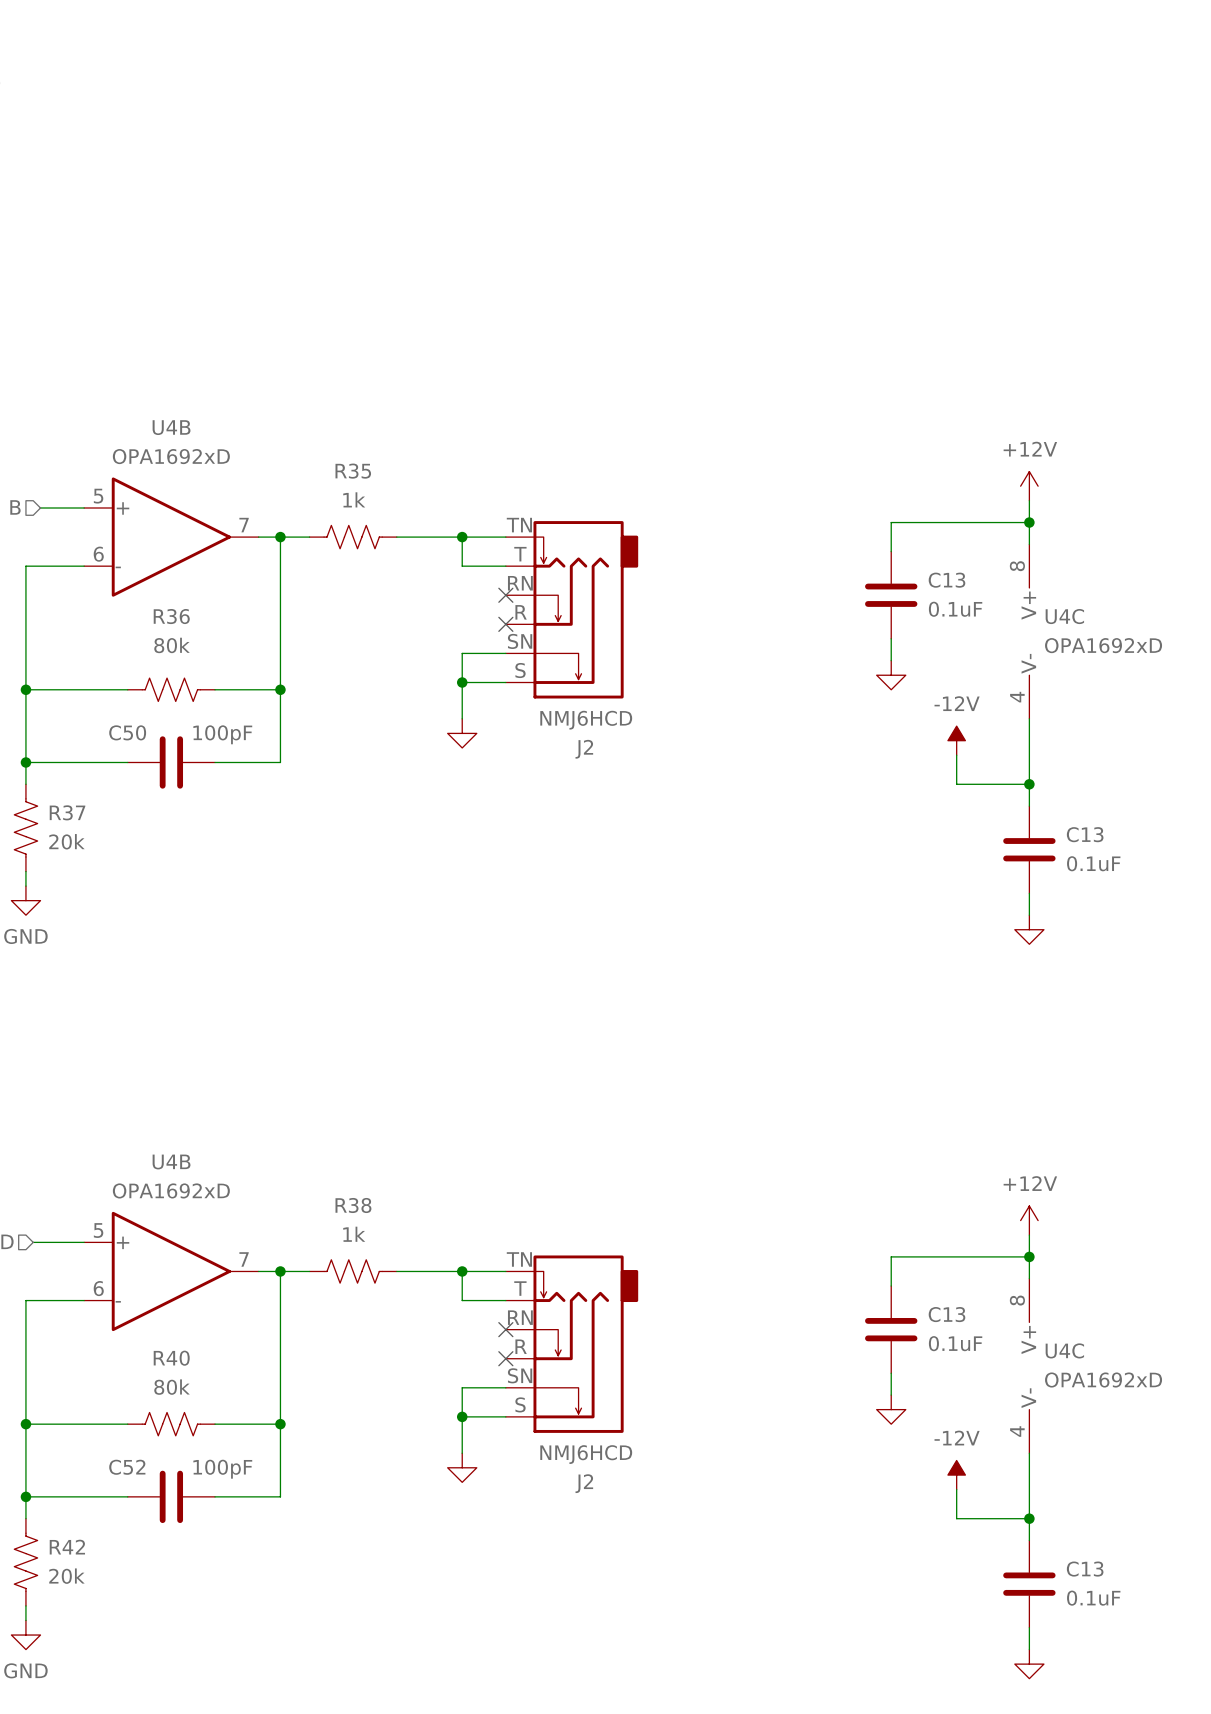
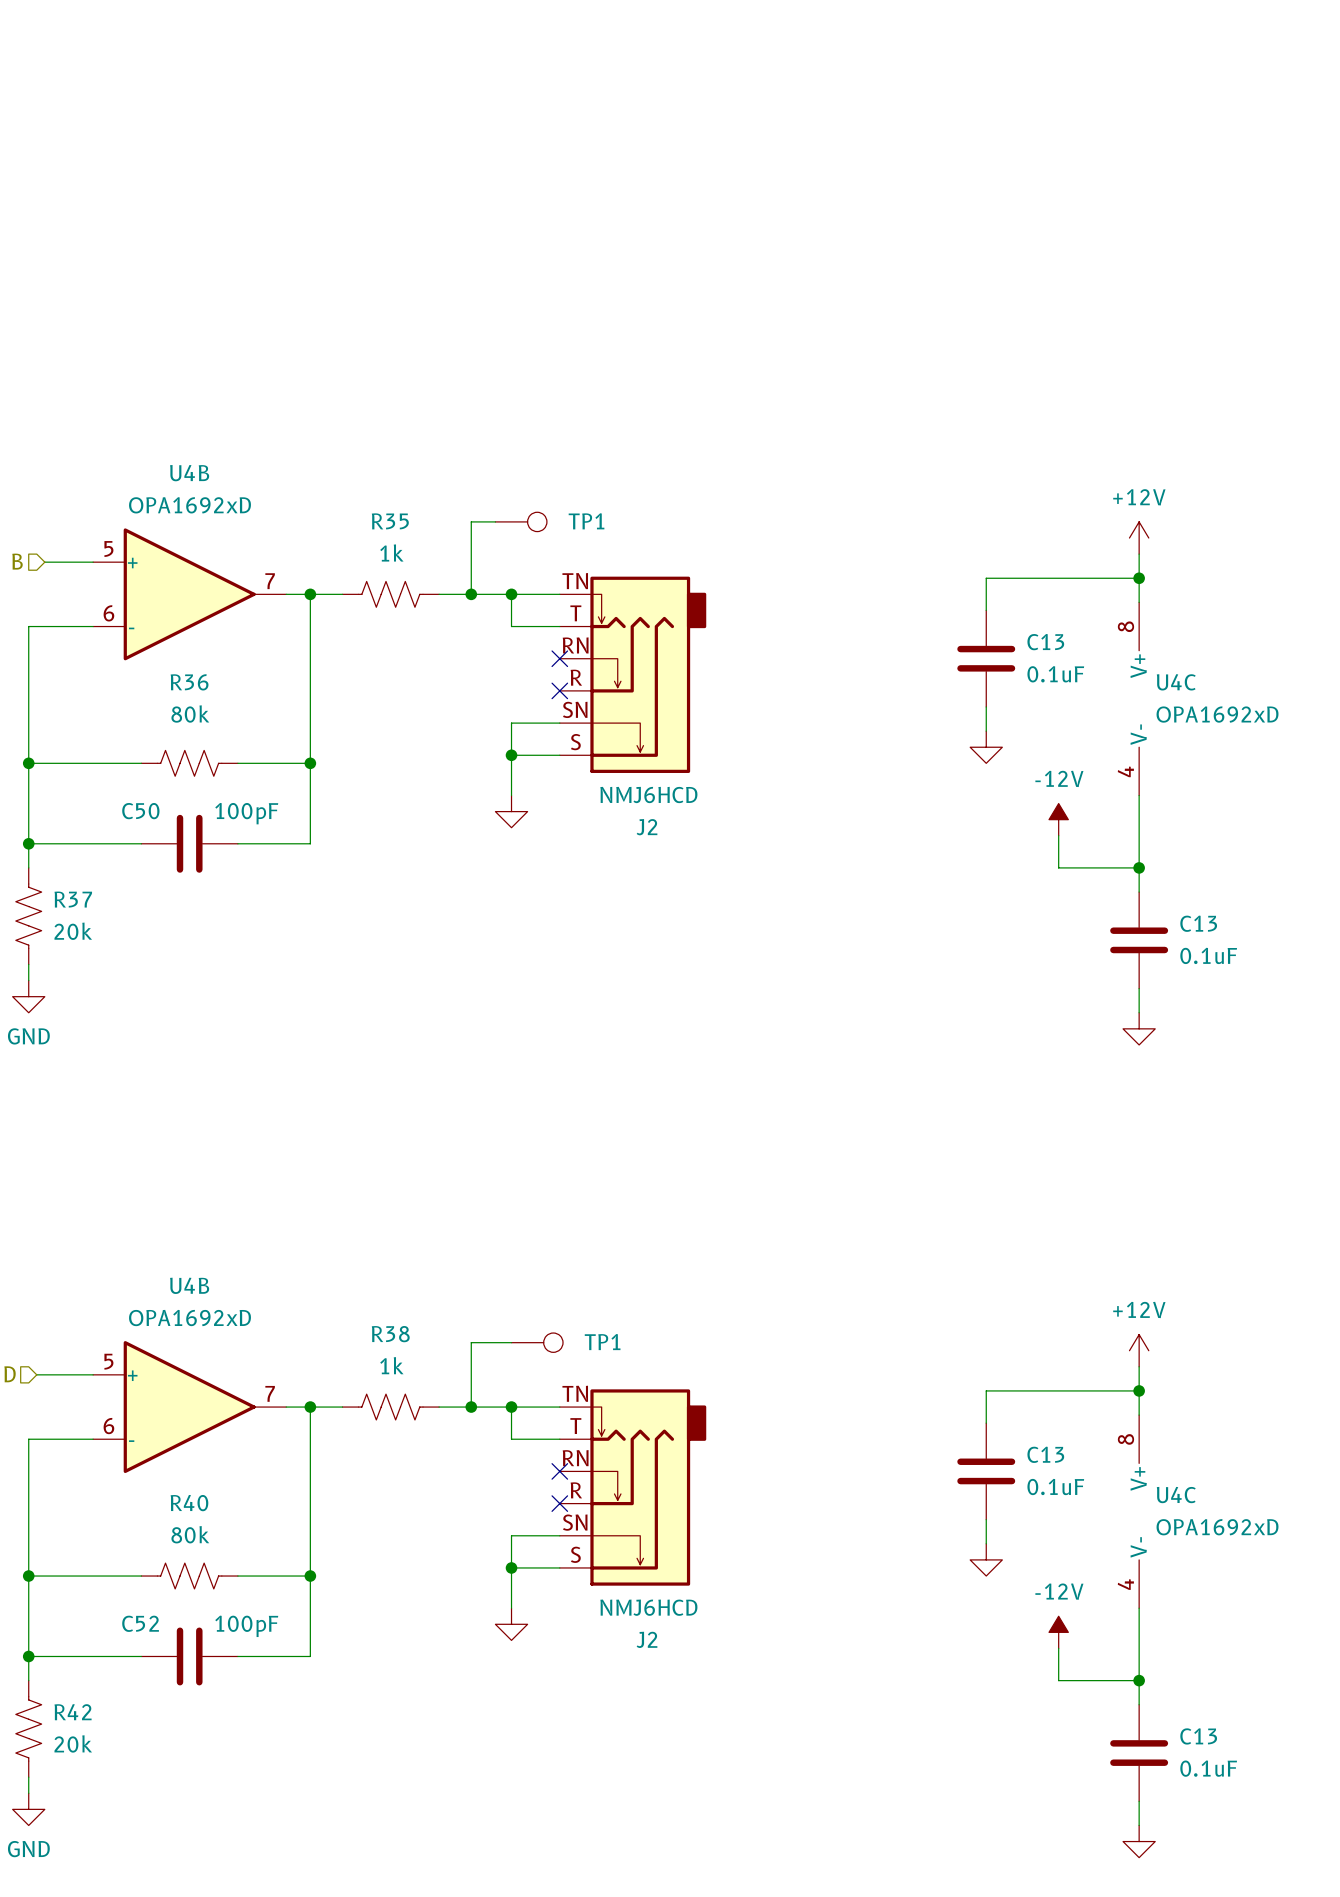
wire: none -> (495, 521) (471, 521) (471, 594)
TP1: none -> (521, 521)
junction: none -> (471, 594)
wire: none -> (511, 1342) (471, 1342) (471, 1407)
TP1: none -> (537, 1342)
junction: none -> (471, 1407)

